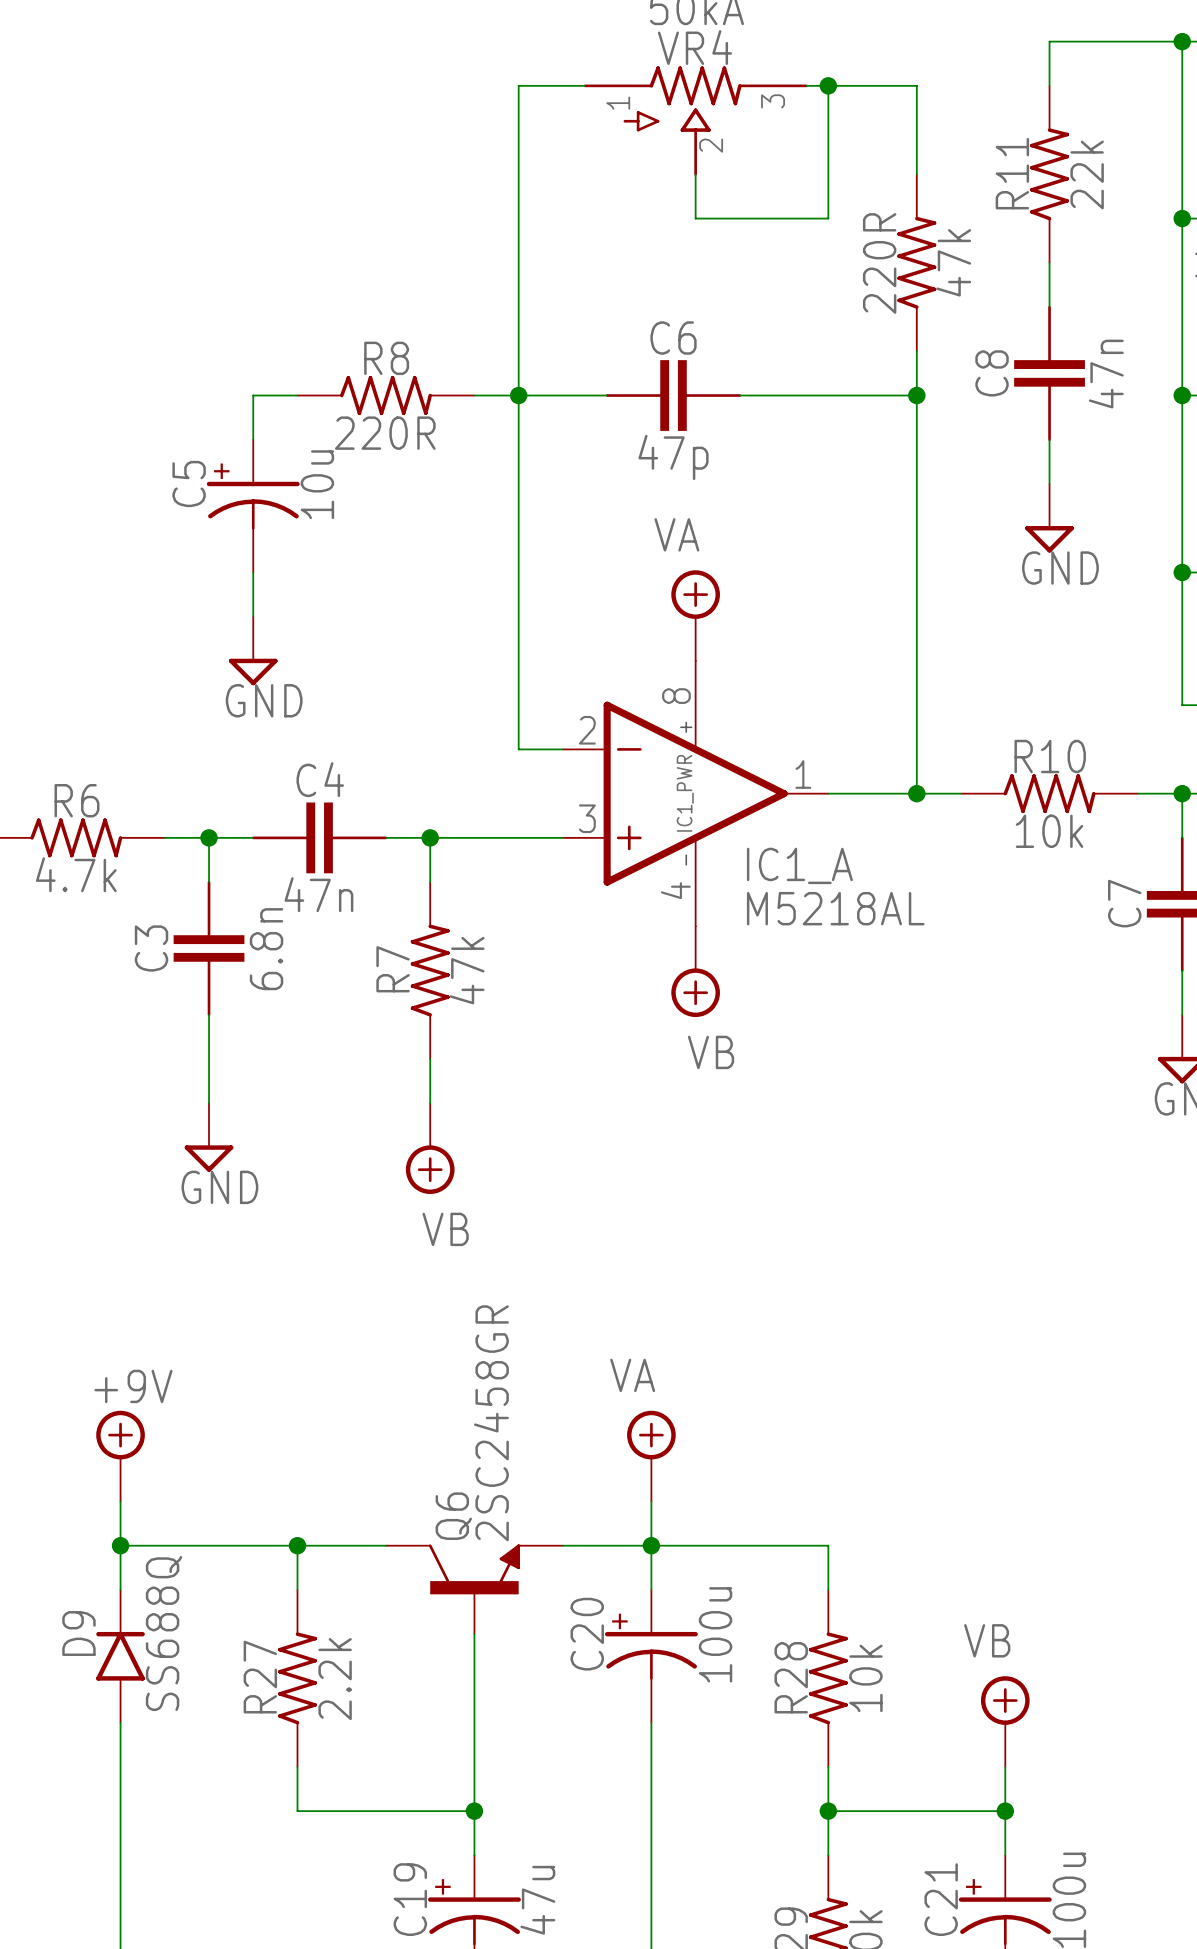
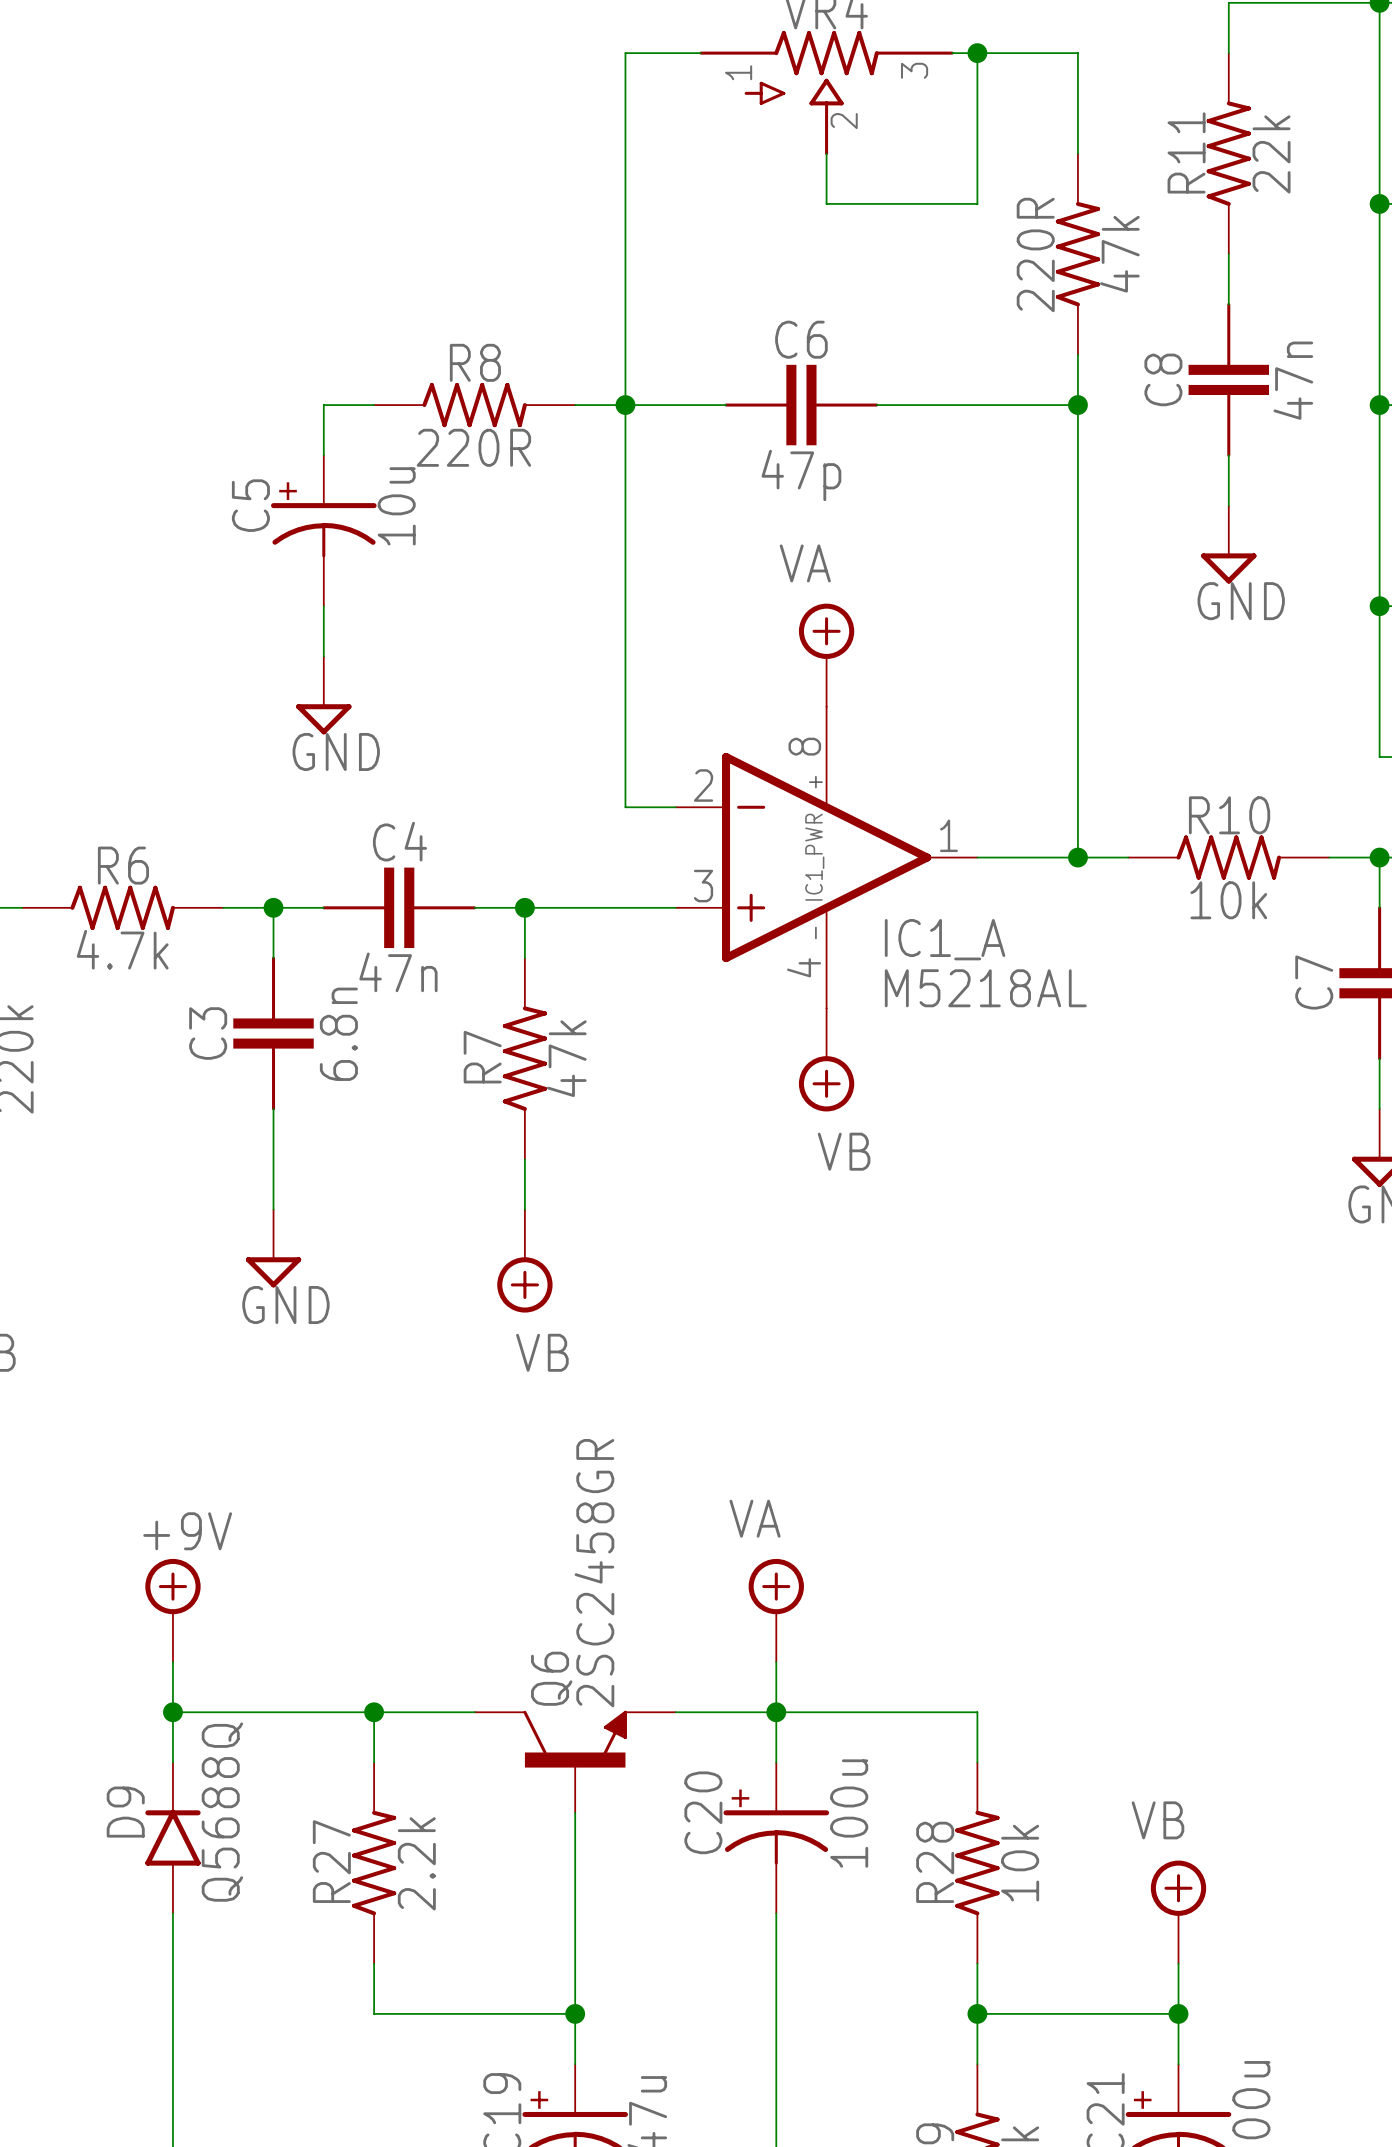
D9 value: SS688Q (164, 1633) -> Q5688Q (222, 1812)

